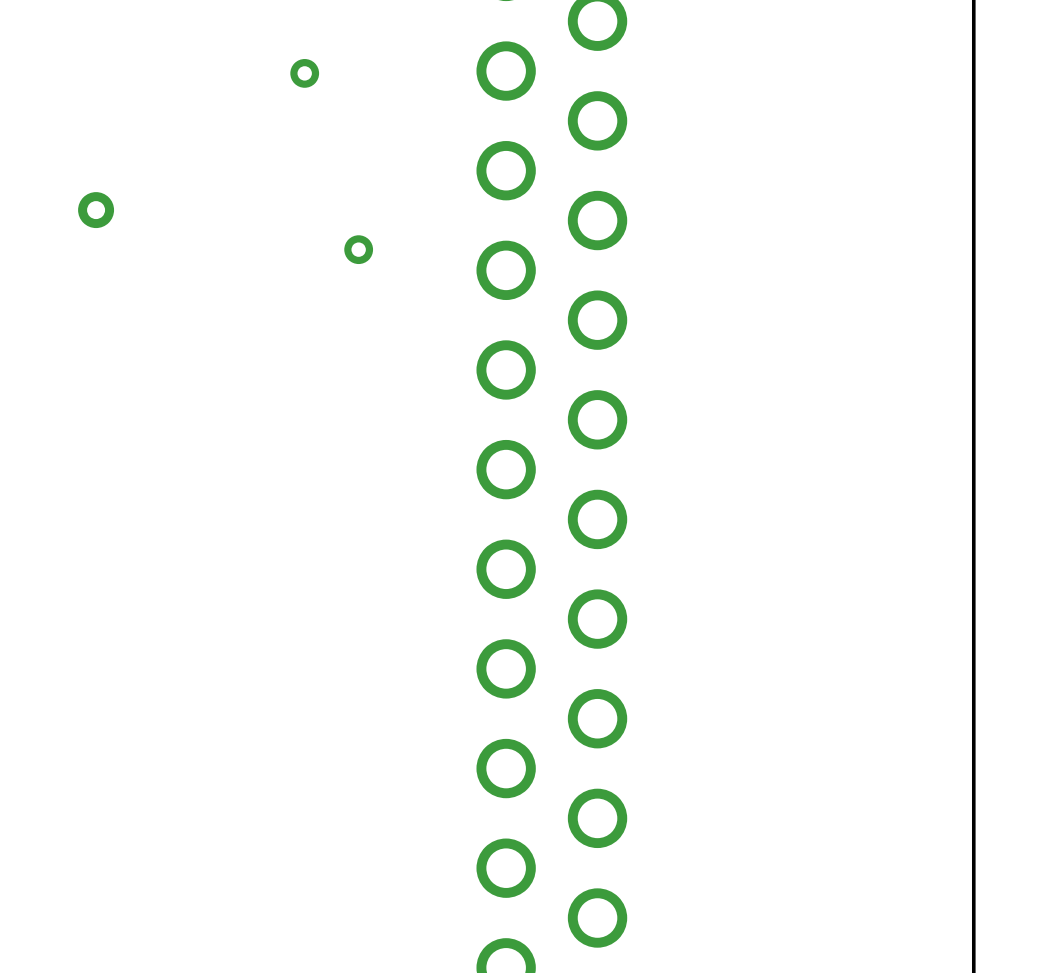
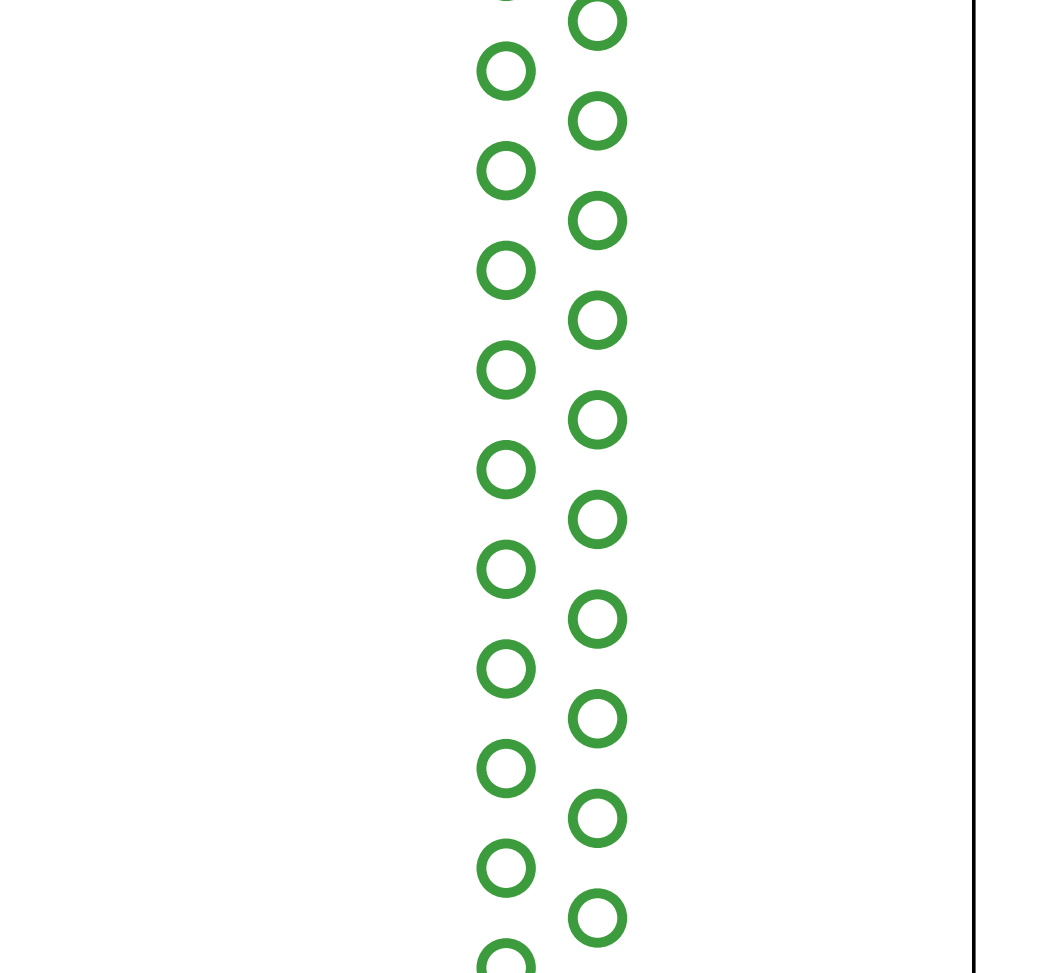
via: (304, 73) -> none
via: (96, 210) -> none
via: (358, 249) -> none

